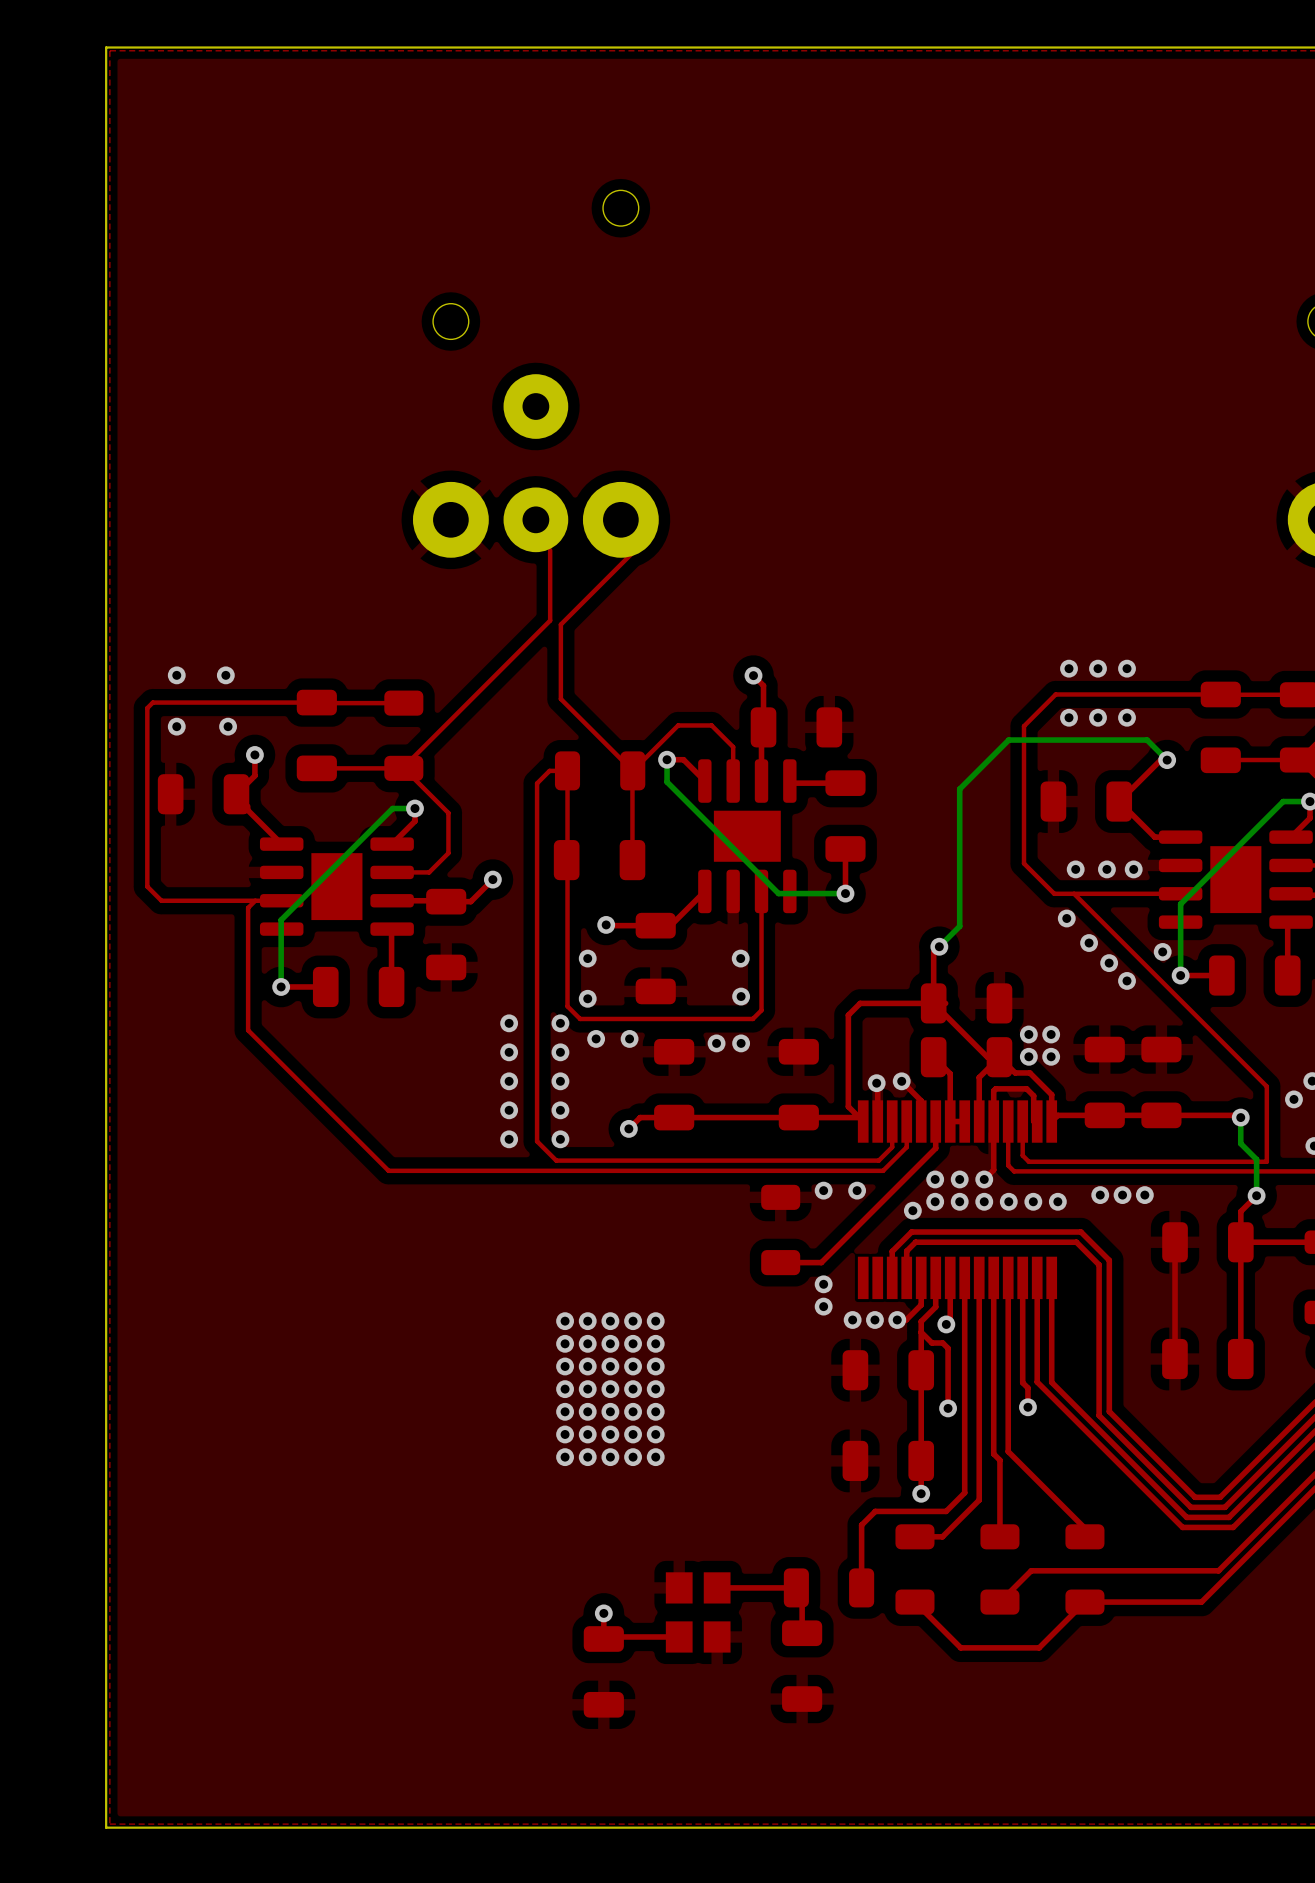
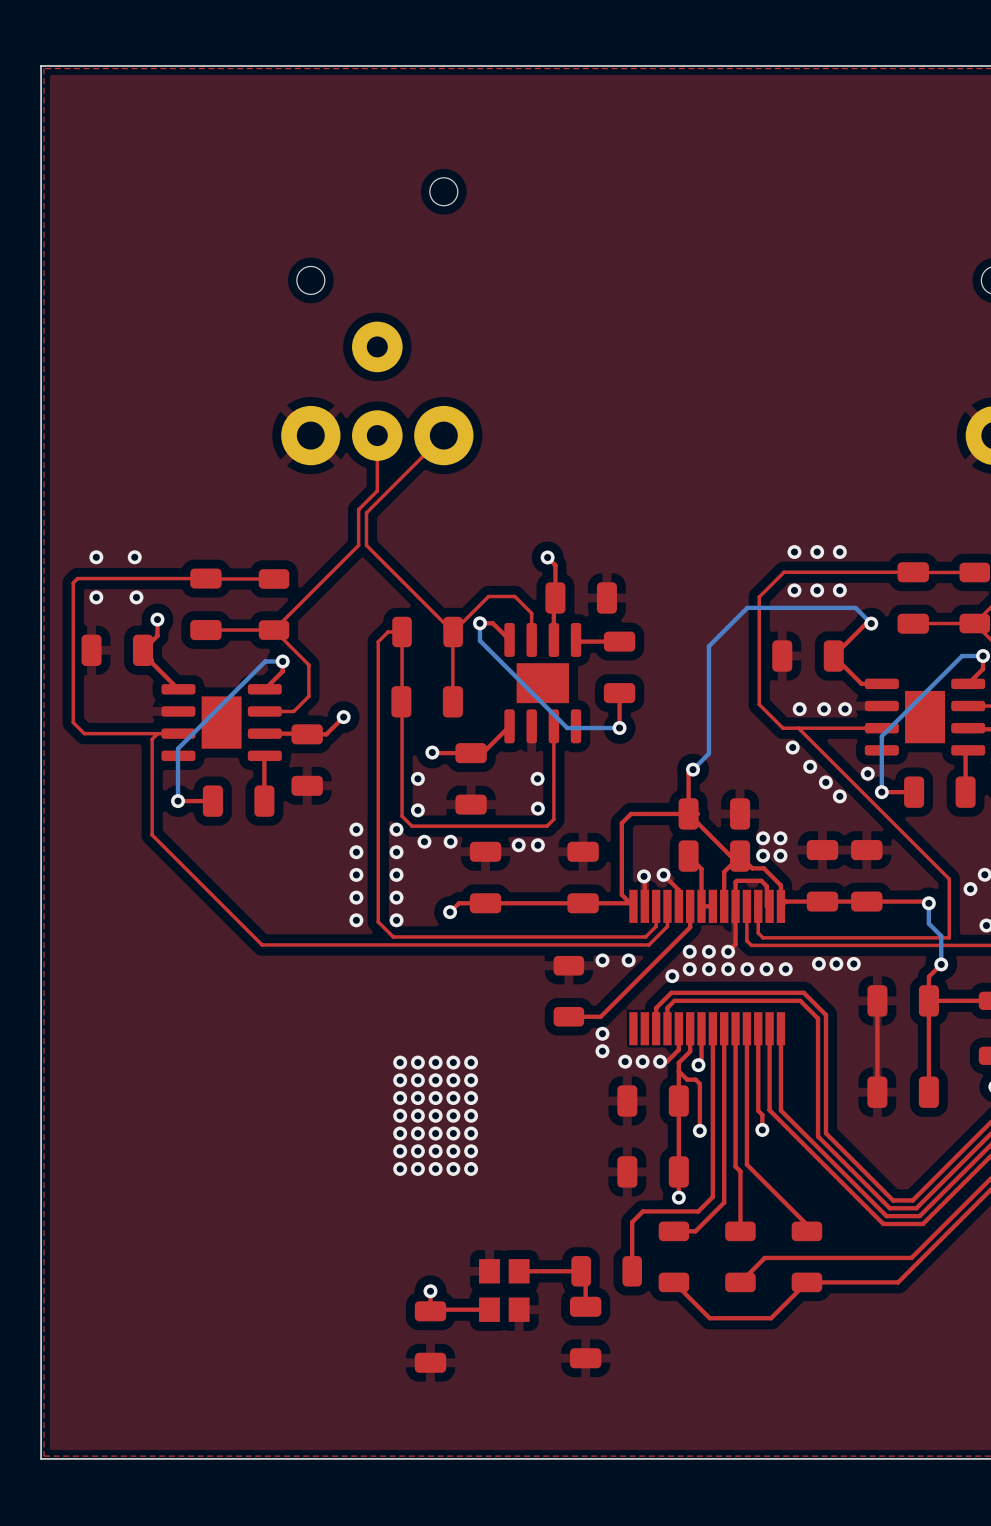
top track: none -> (377, 435) (377, 490) (358, 509) (358, 545) (274, 630)
top track: (550, 550) (550, 620) (403, 766) -> none
top track: (635, 550) (560, 624) (560, 699) -> (443, 435) (366, 512) (366, 545) (396, 575)

